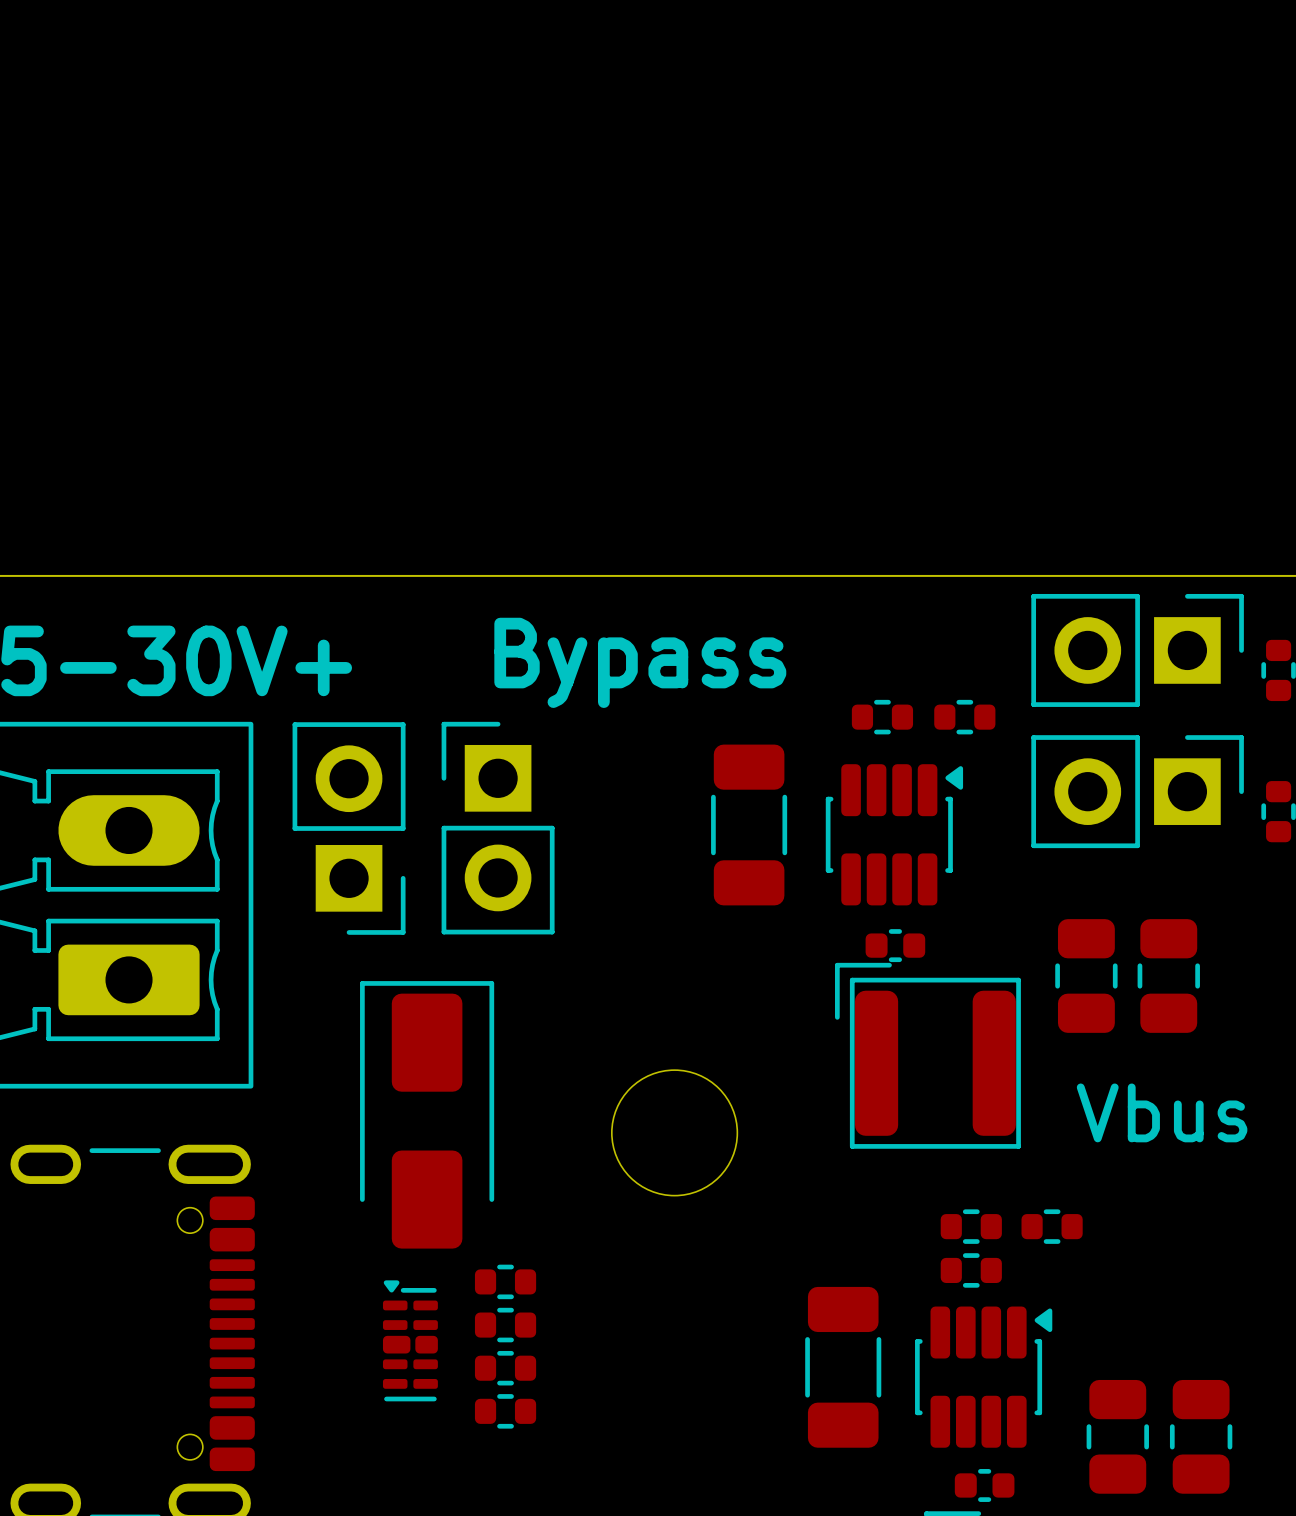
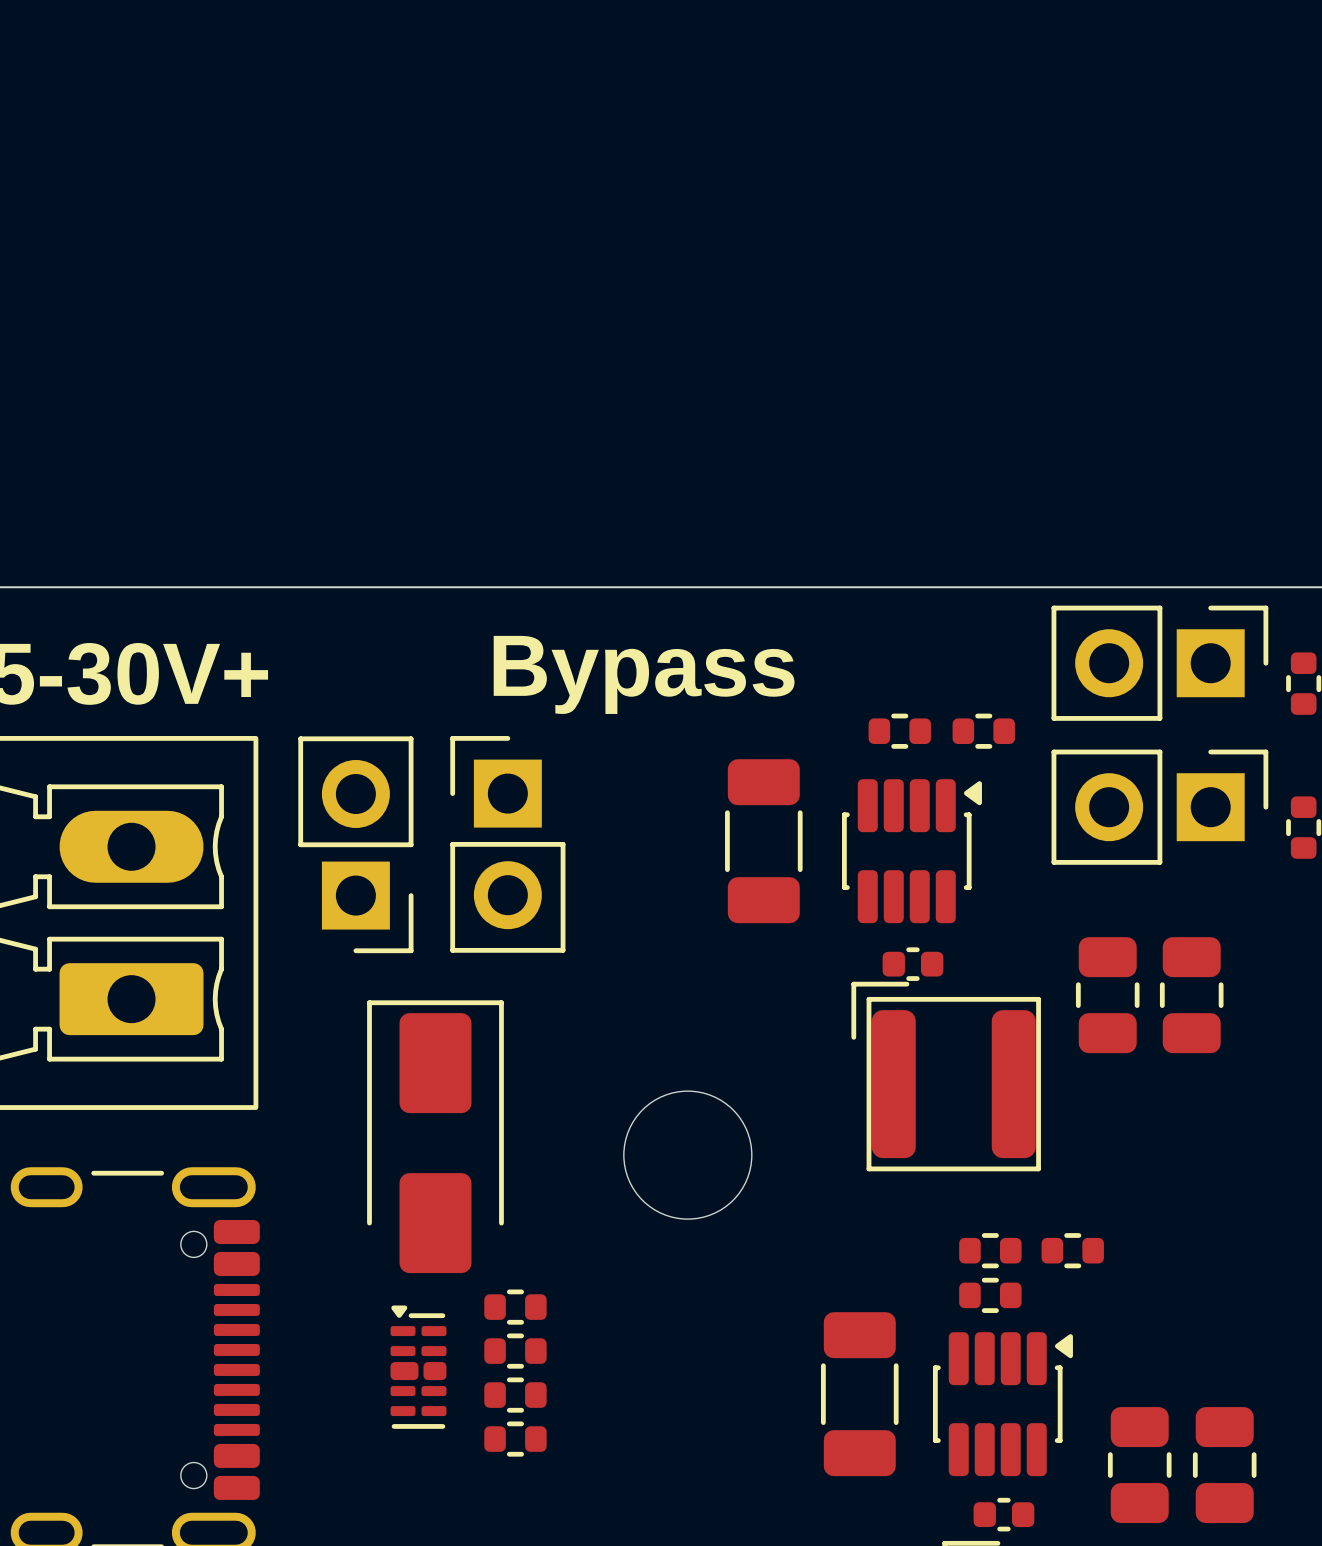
text: Vbus (1162, 1112) -> none

